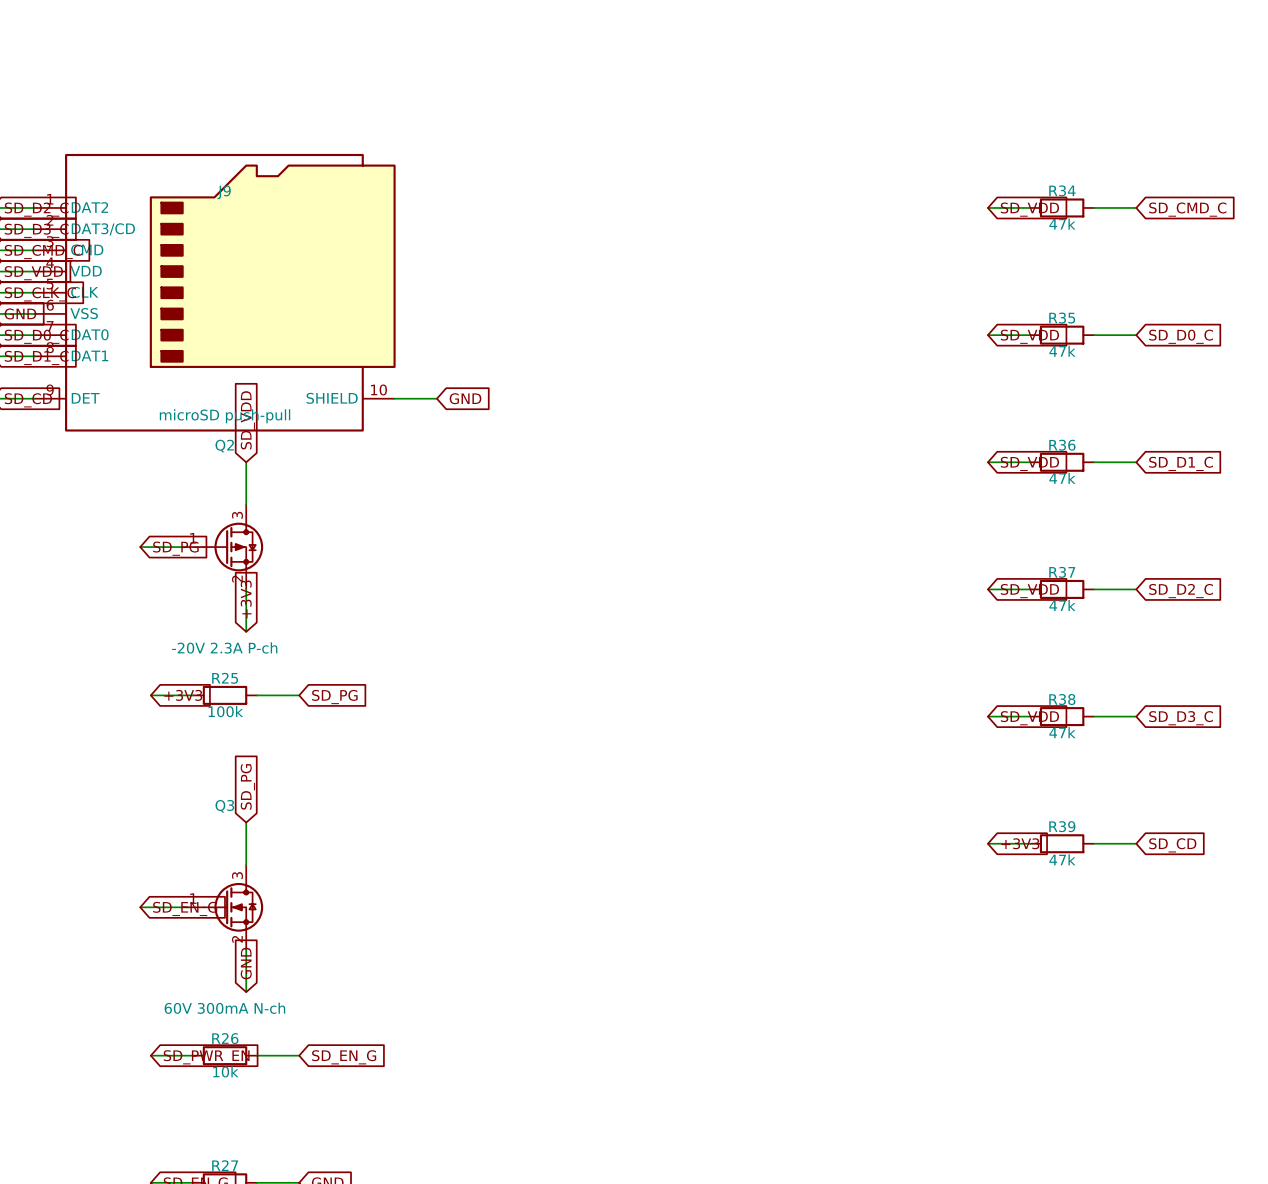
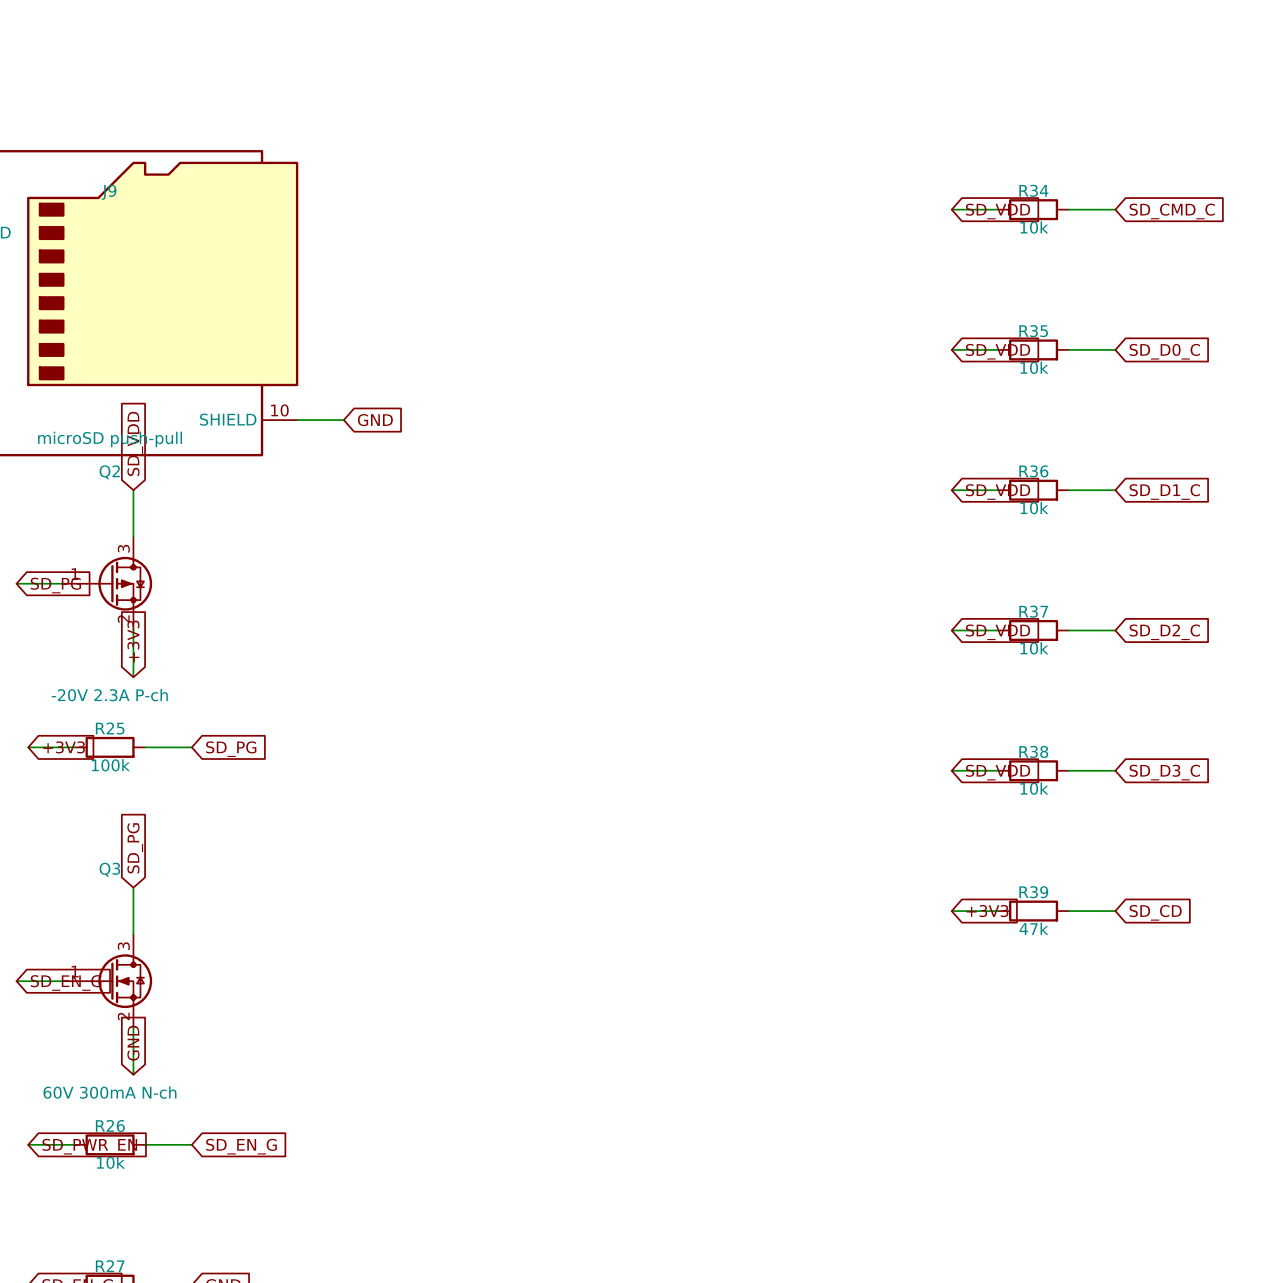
R34 value: 47k (1062, 224) -> 10k (1034, 227)
R35 value: 47k (1062, 351) -> 10k (1034, 367)
R36 value: 47k (1062, 478) -> 10k (1034, 508)
R37 value: 47k (1062, 605) -> 10k (1034, 648)
R38 value: 47k (1062, 732) -> 10k (1034, 788)

